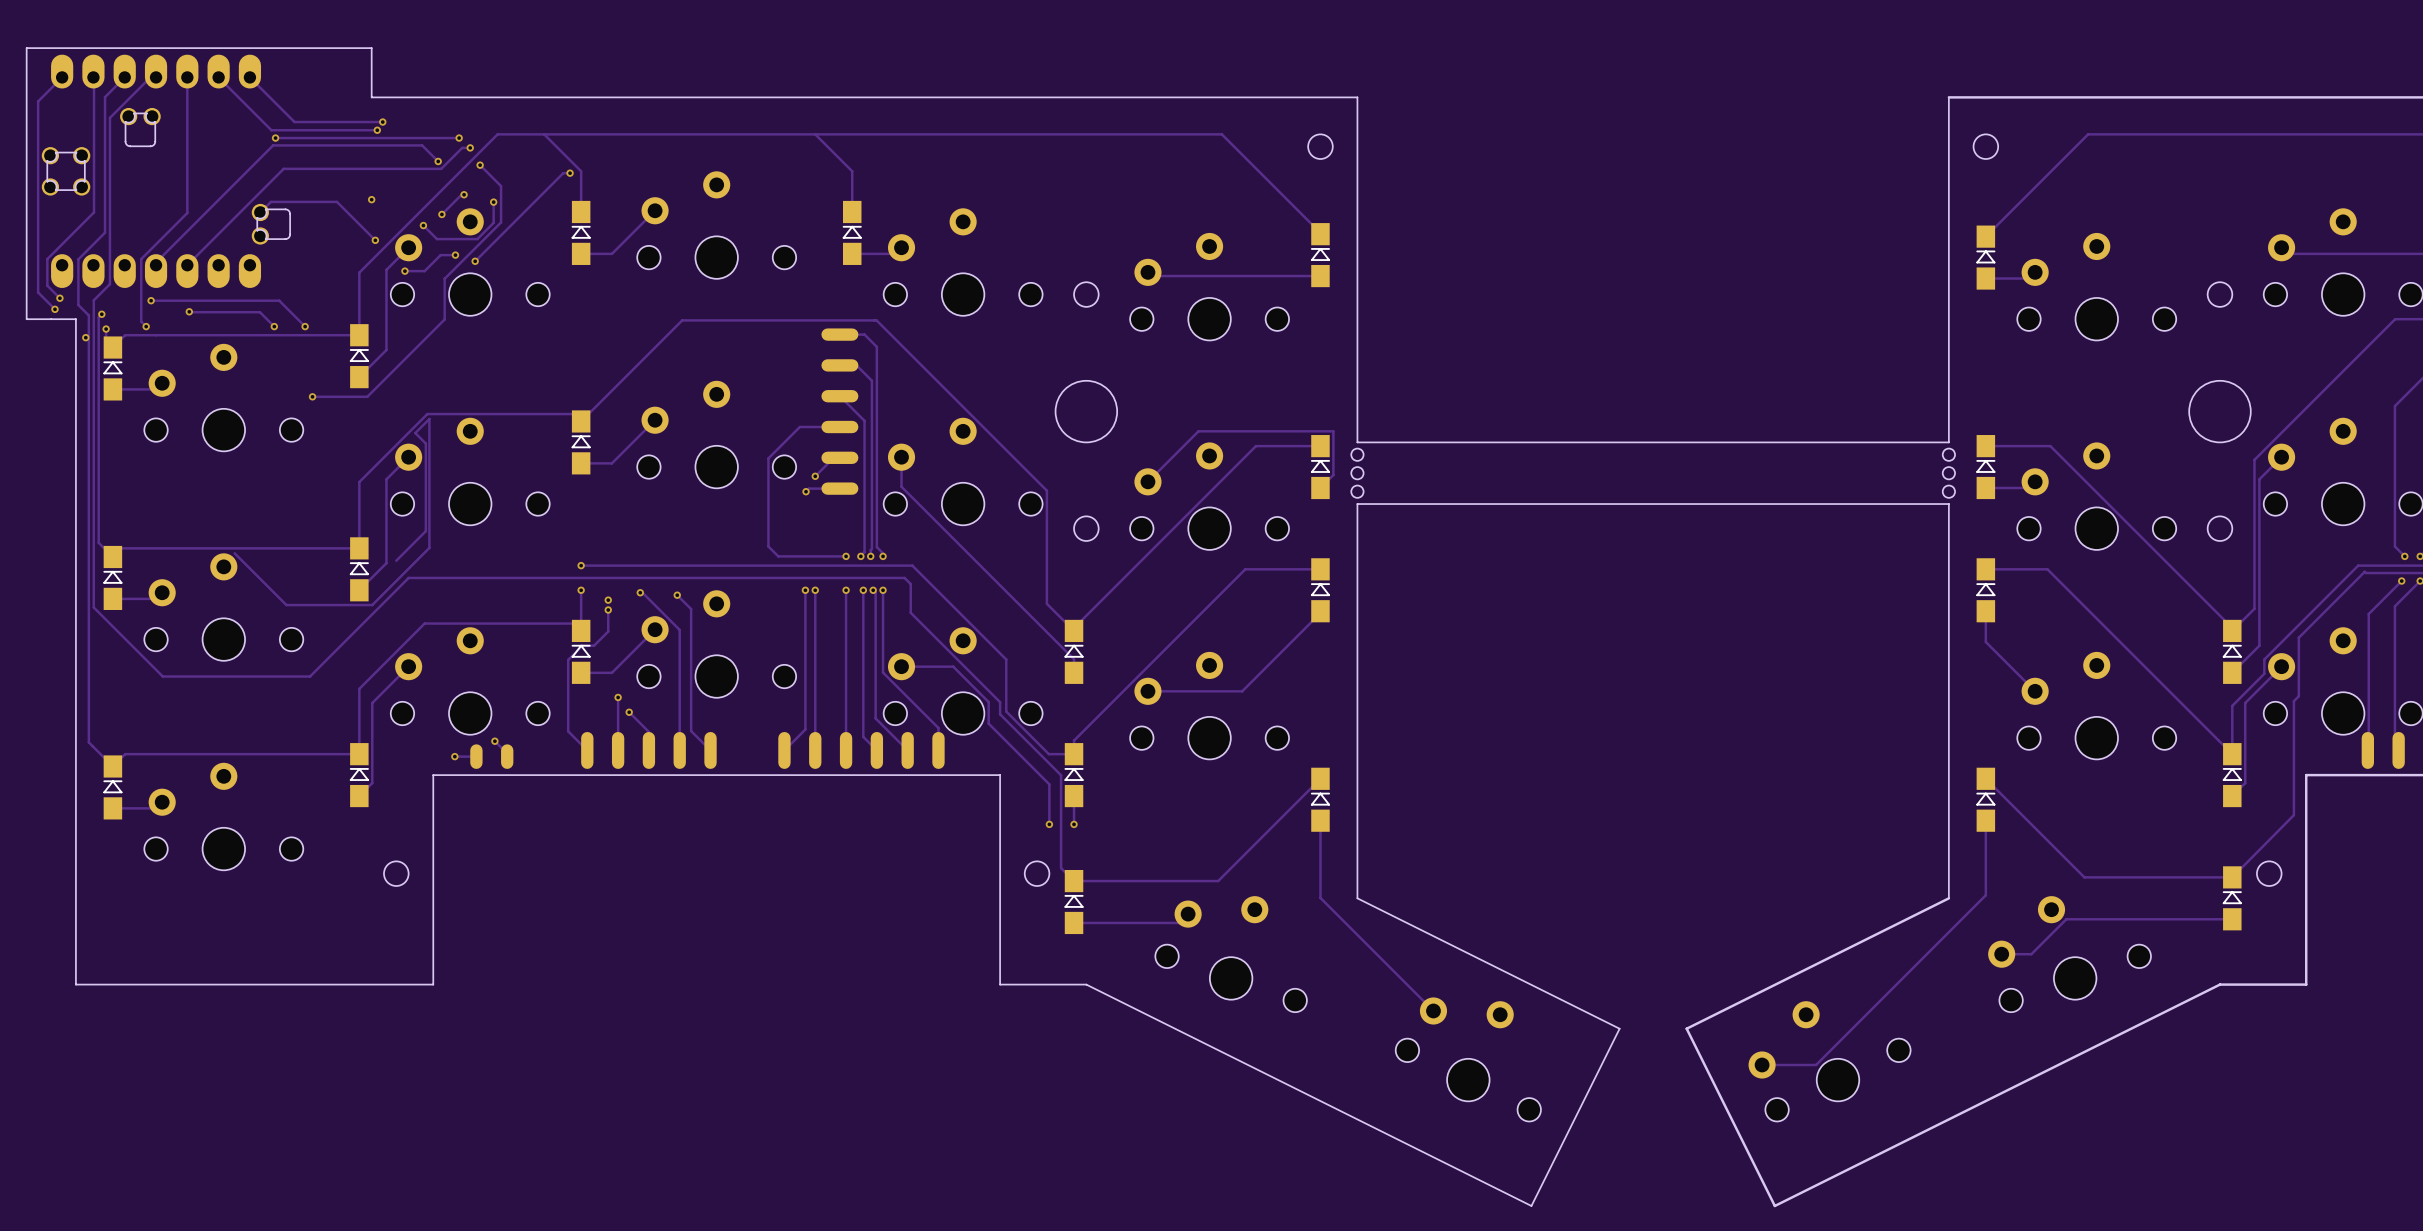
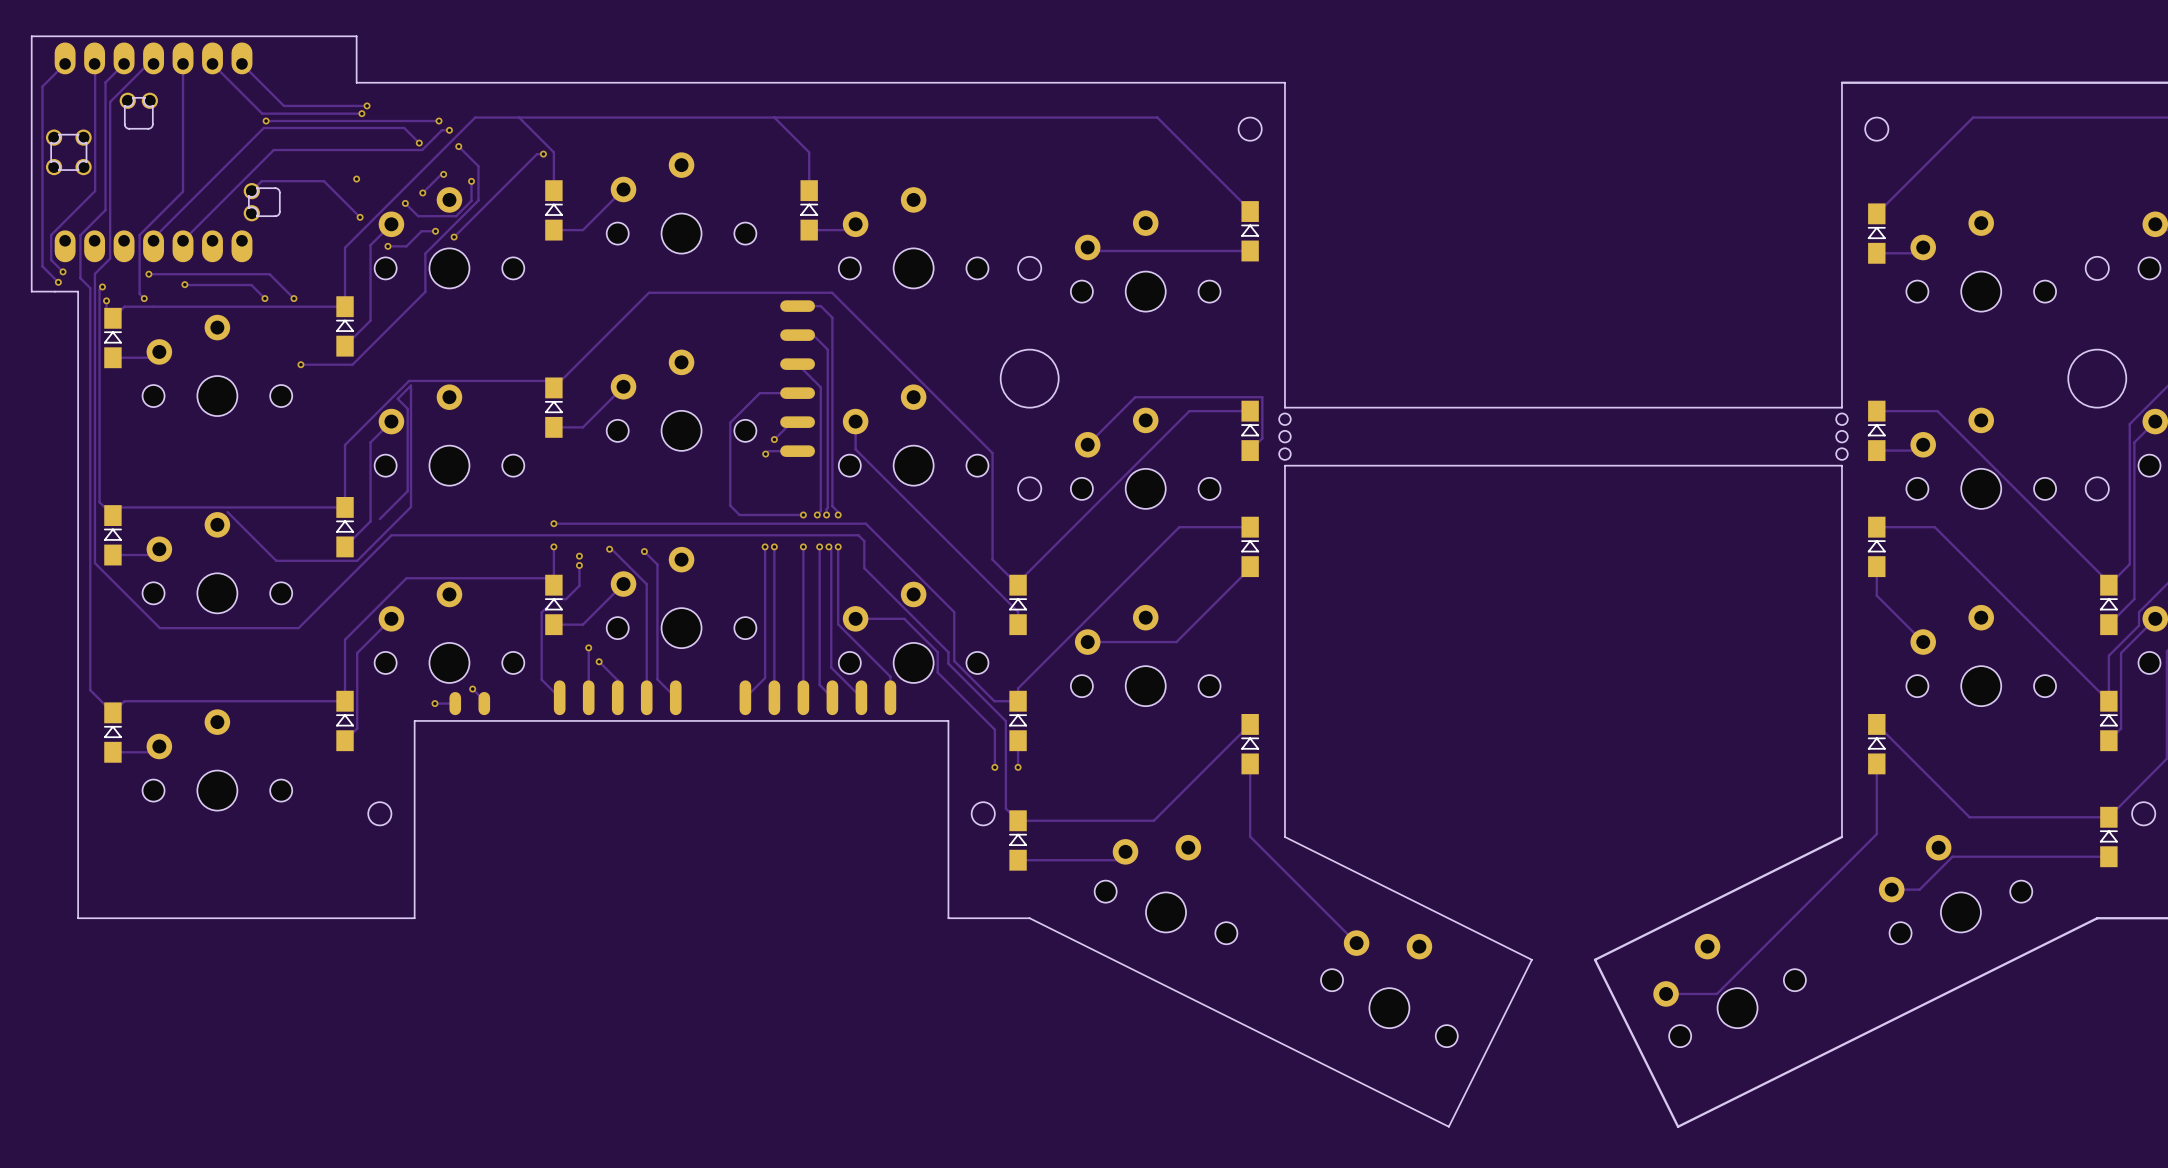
via: (85, 337) -> none

